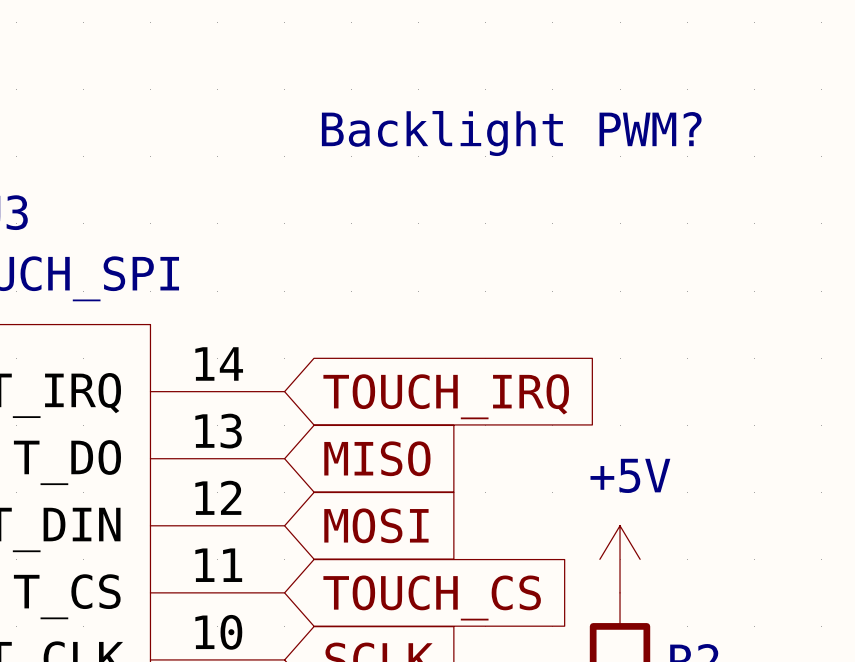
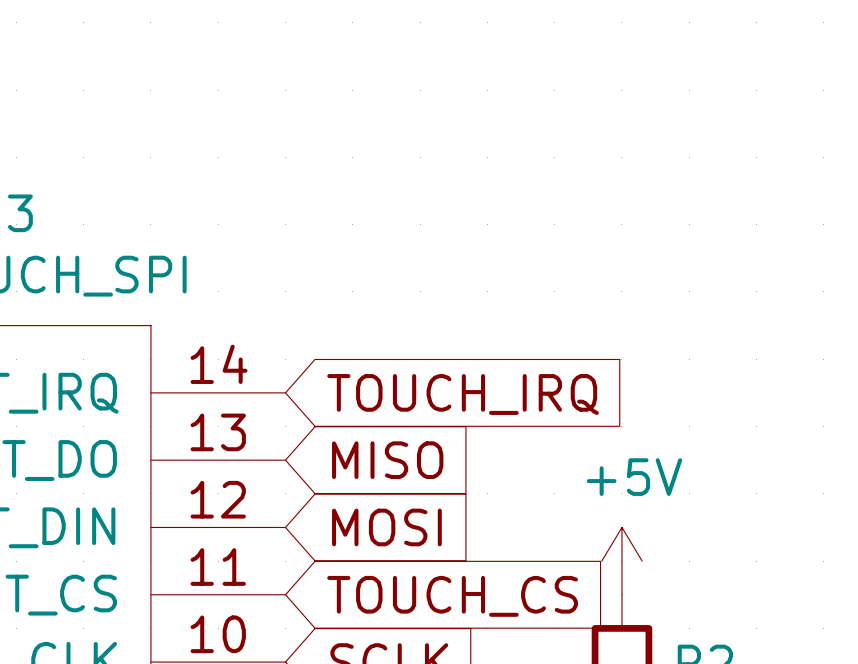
text: Backlight PWM? (511, 133) -> none

